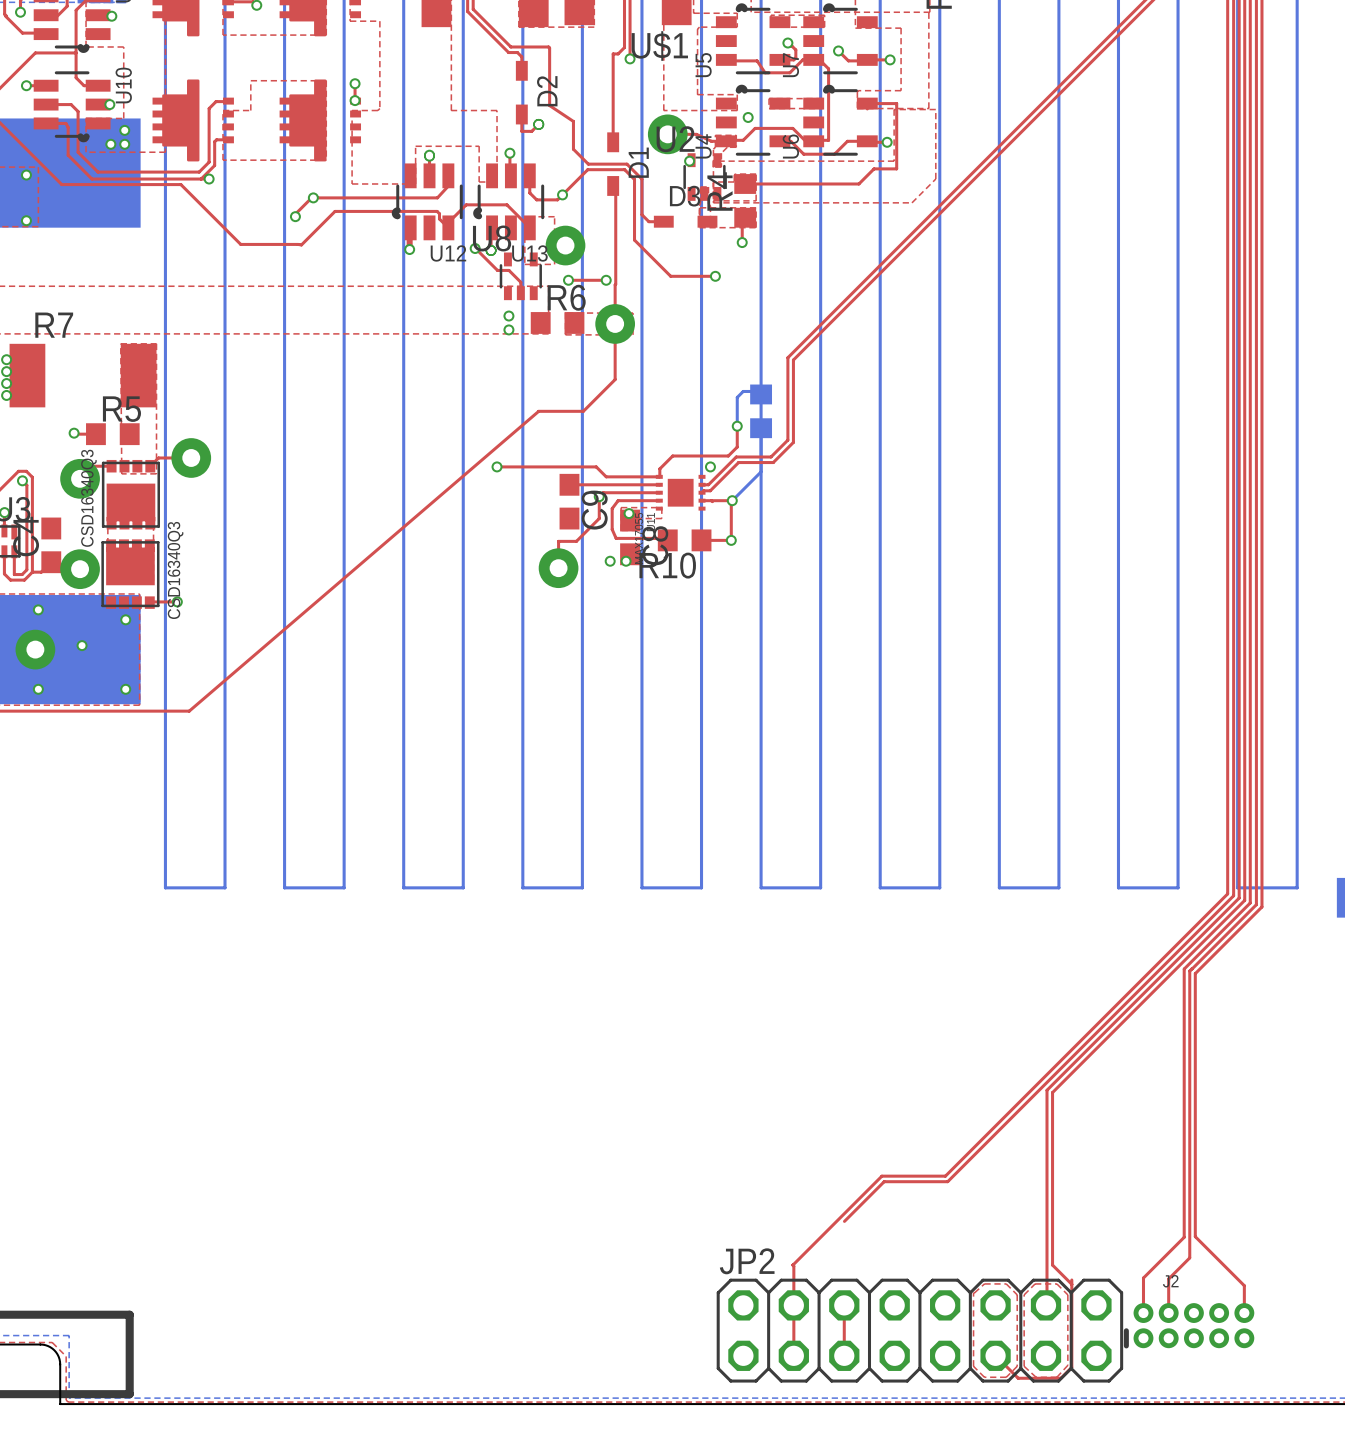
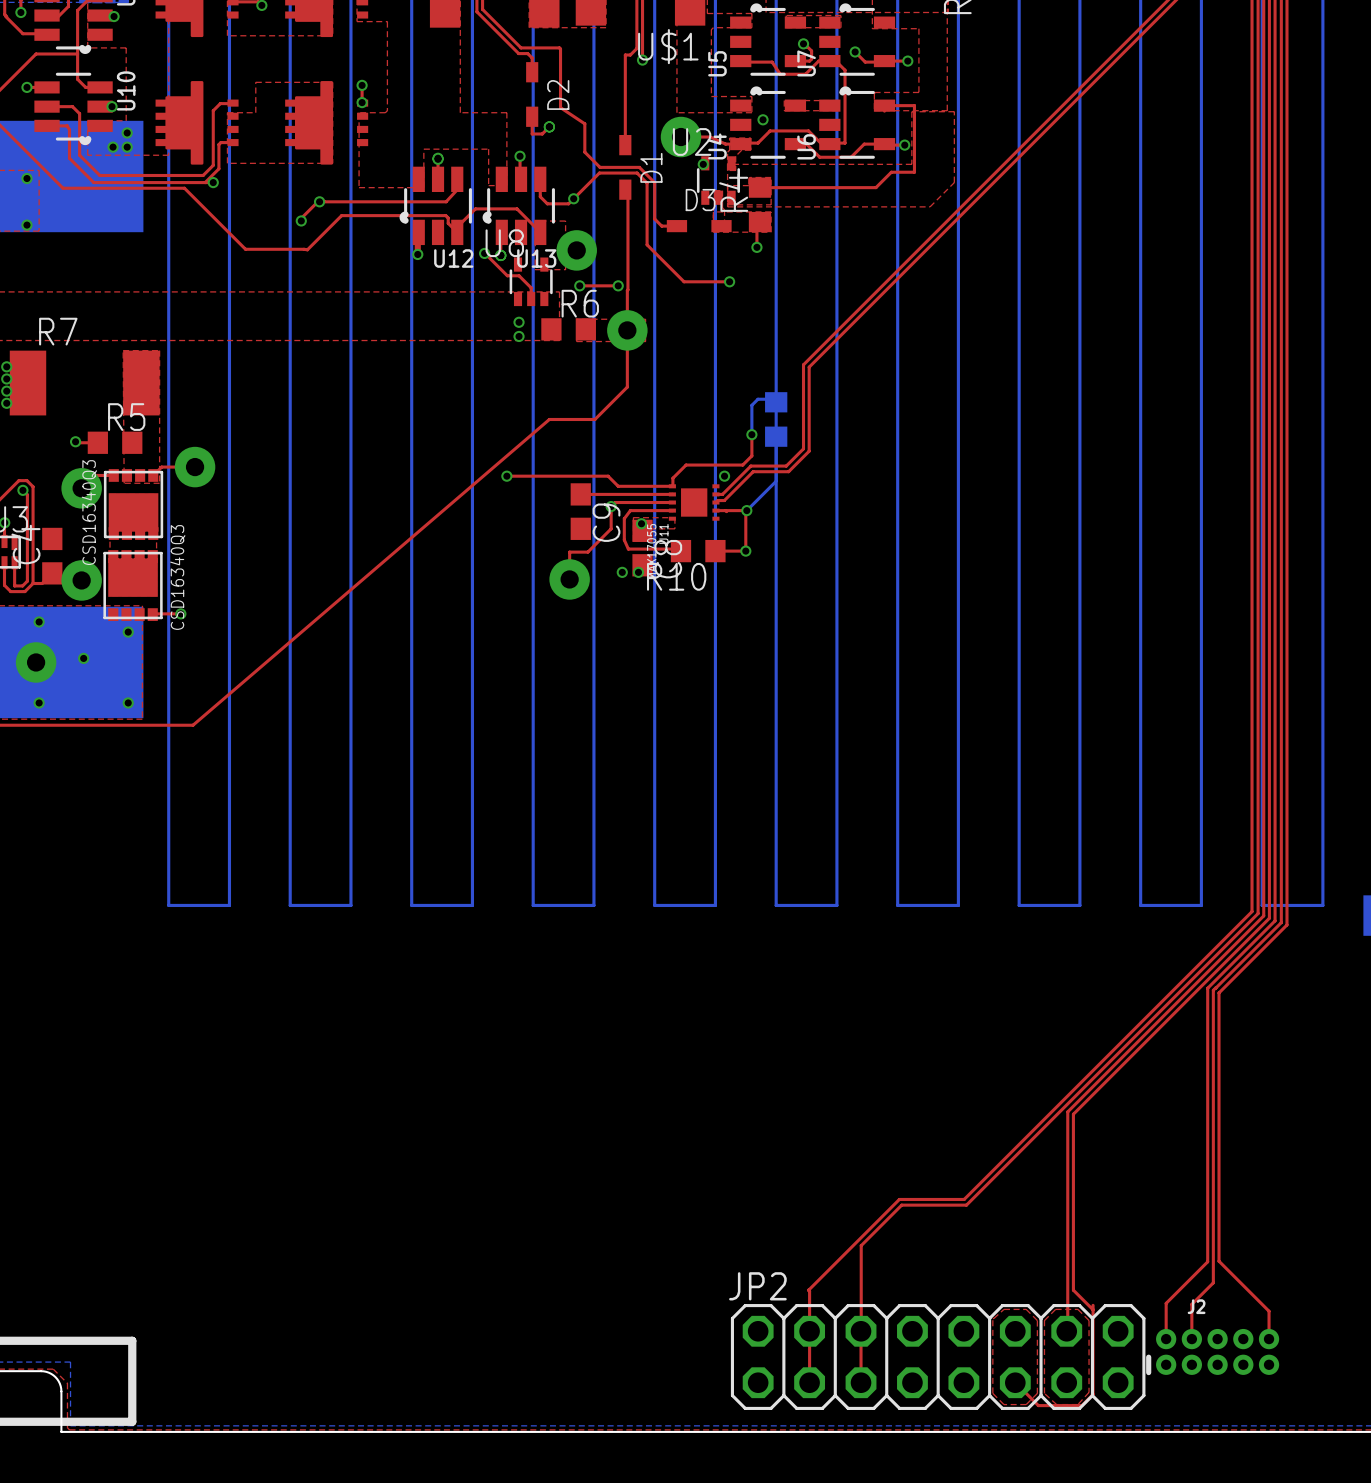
top track: none -> (861, 1245) (861, 1333)

